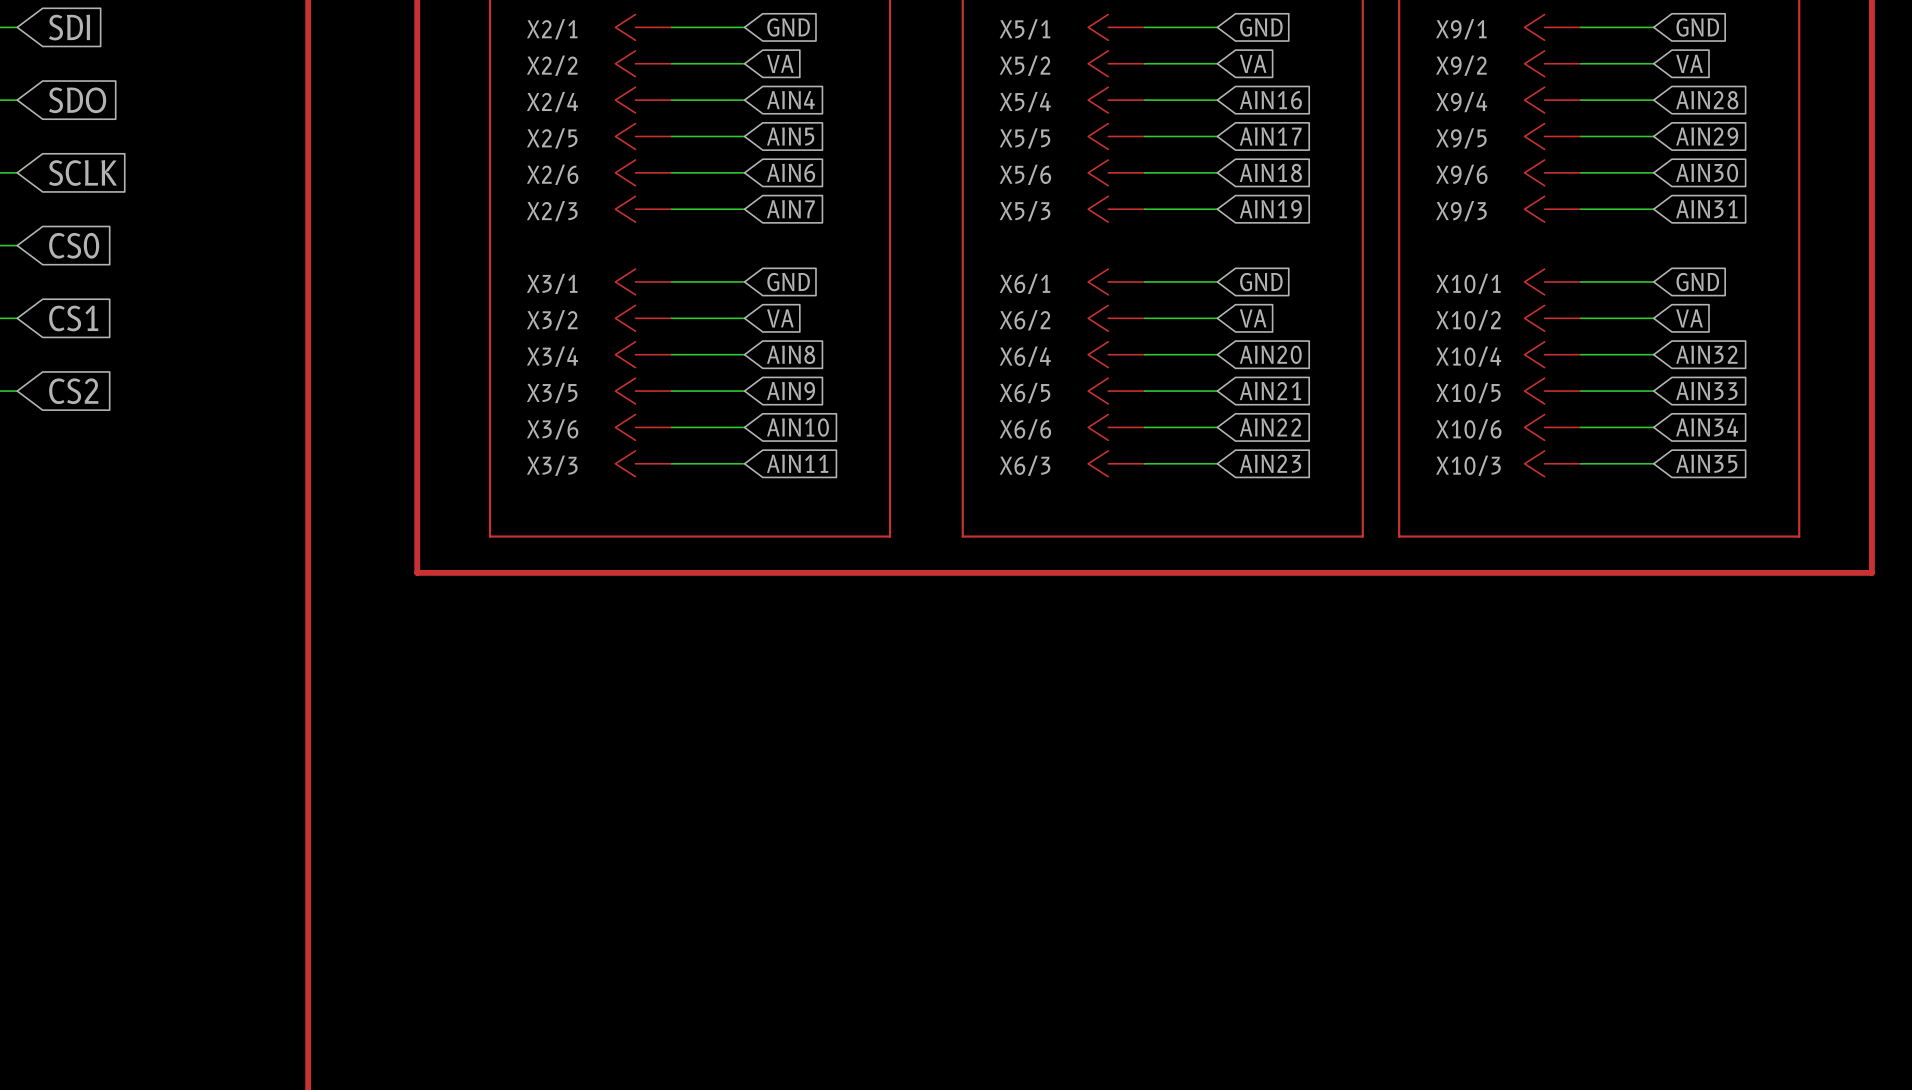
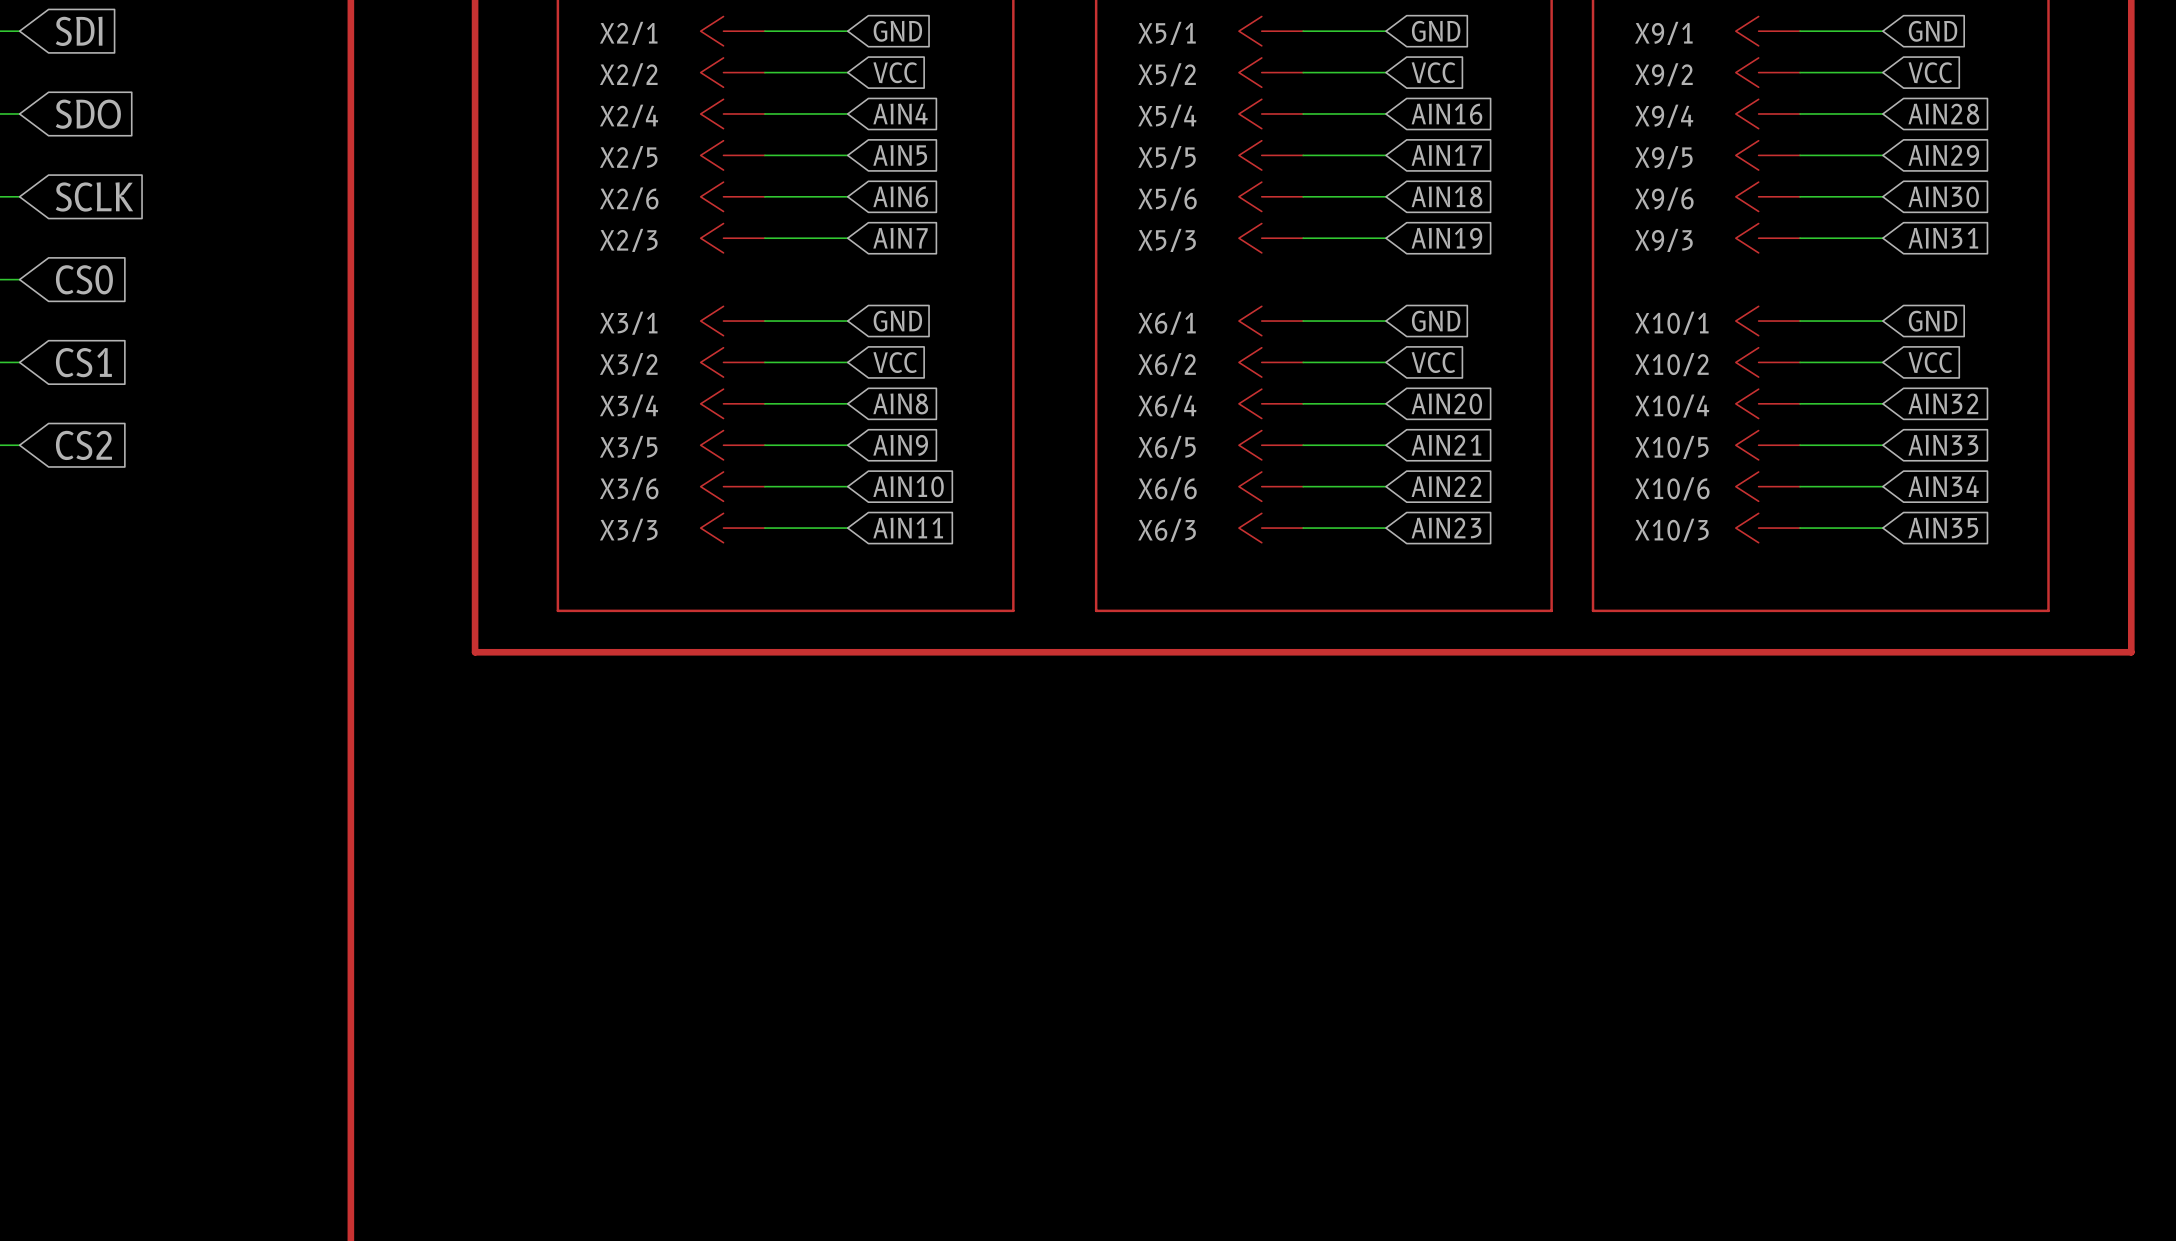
global label: VA (780, 63) -> VCC (895, 72)
global label: VA (1253, 63) -> VCC (1433, 72)
global label: VA (1689, 63) -> VCC (1930, 72)
global label: VA (780, 318) -> VCC (895, 362)
global label: VA (1253, 318) -> VCC (1433, 362)
global label: VA (1689, 318) -> VCC (1930, 362)

